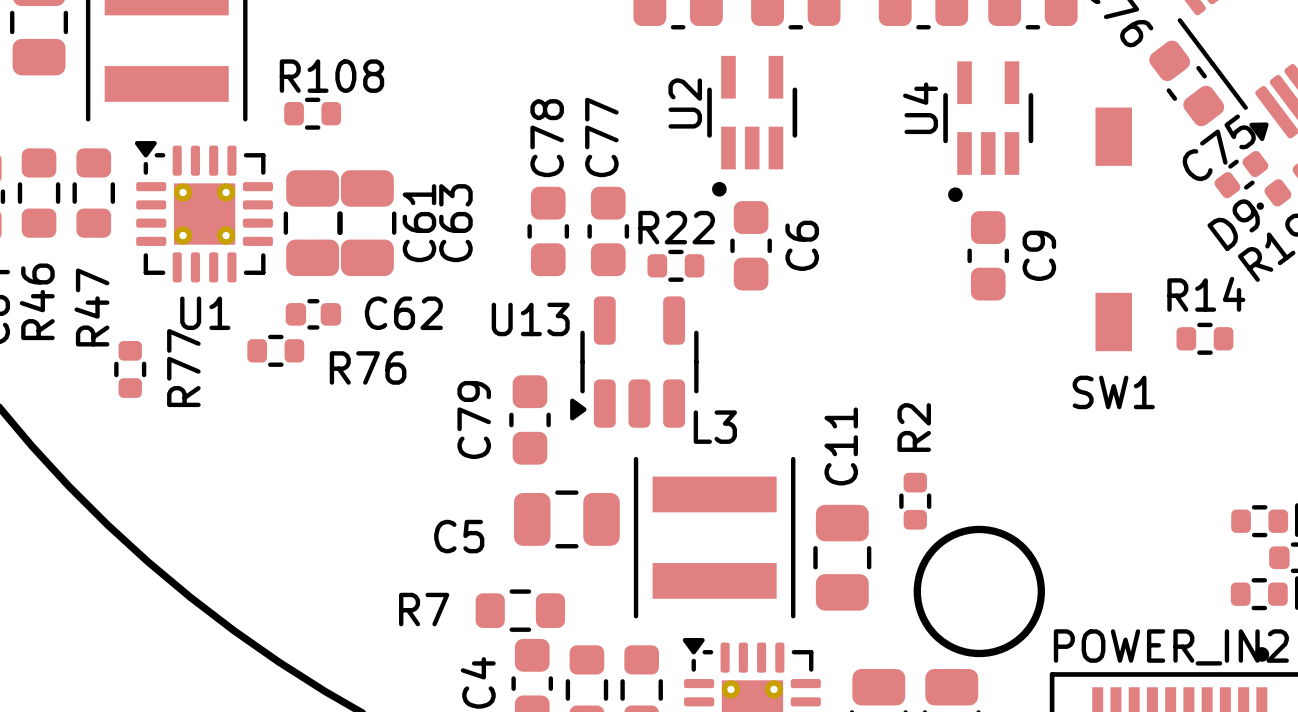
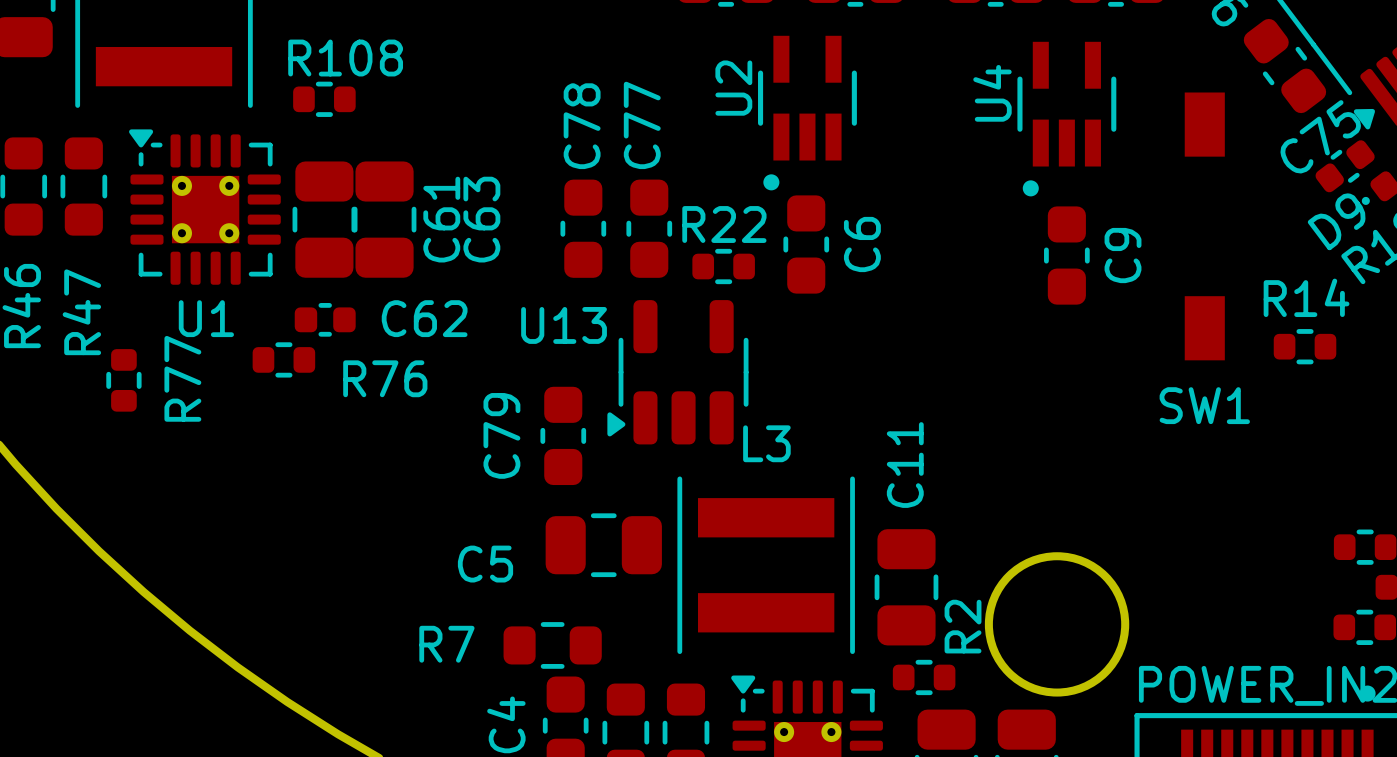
R2 rotation: 0° (915, 501) -> 90° clockwise (924, 677)
R2 position: (915, 501) -> (924, 677)

